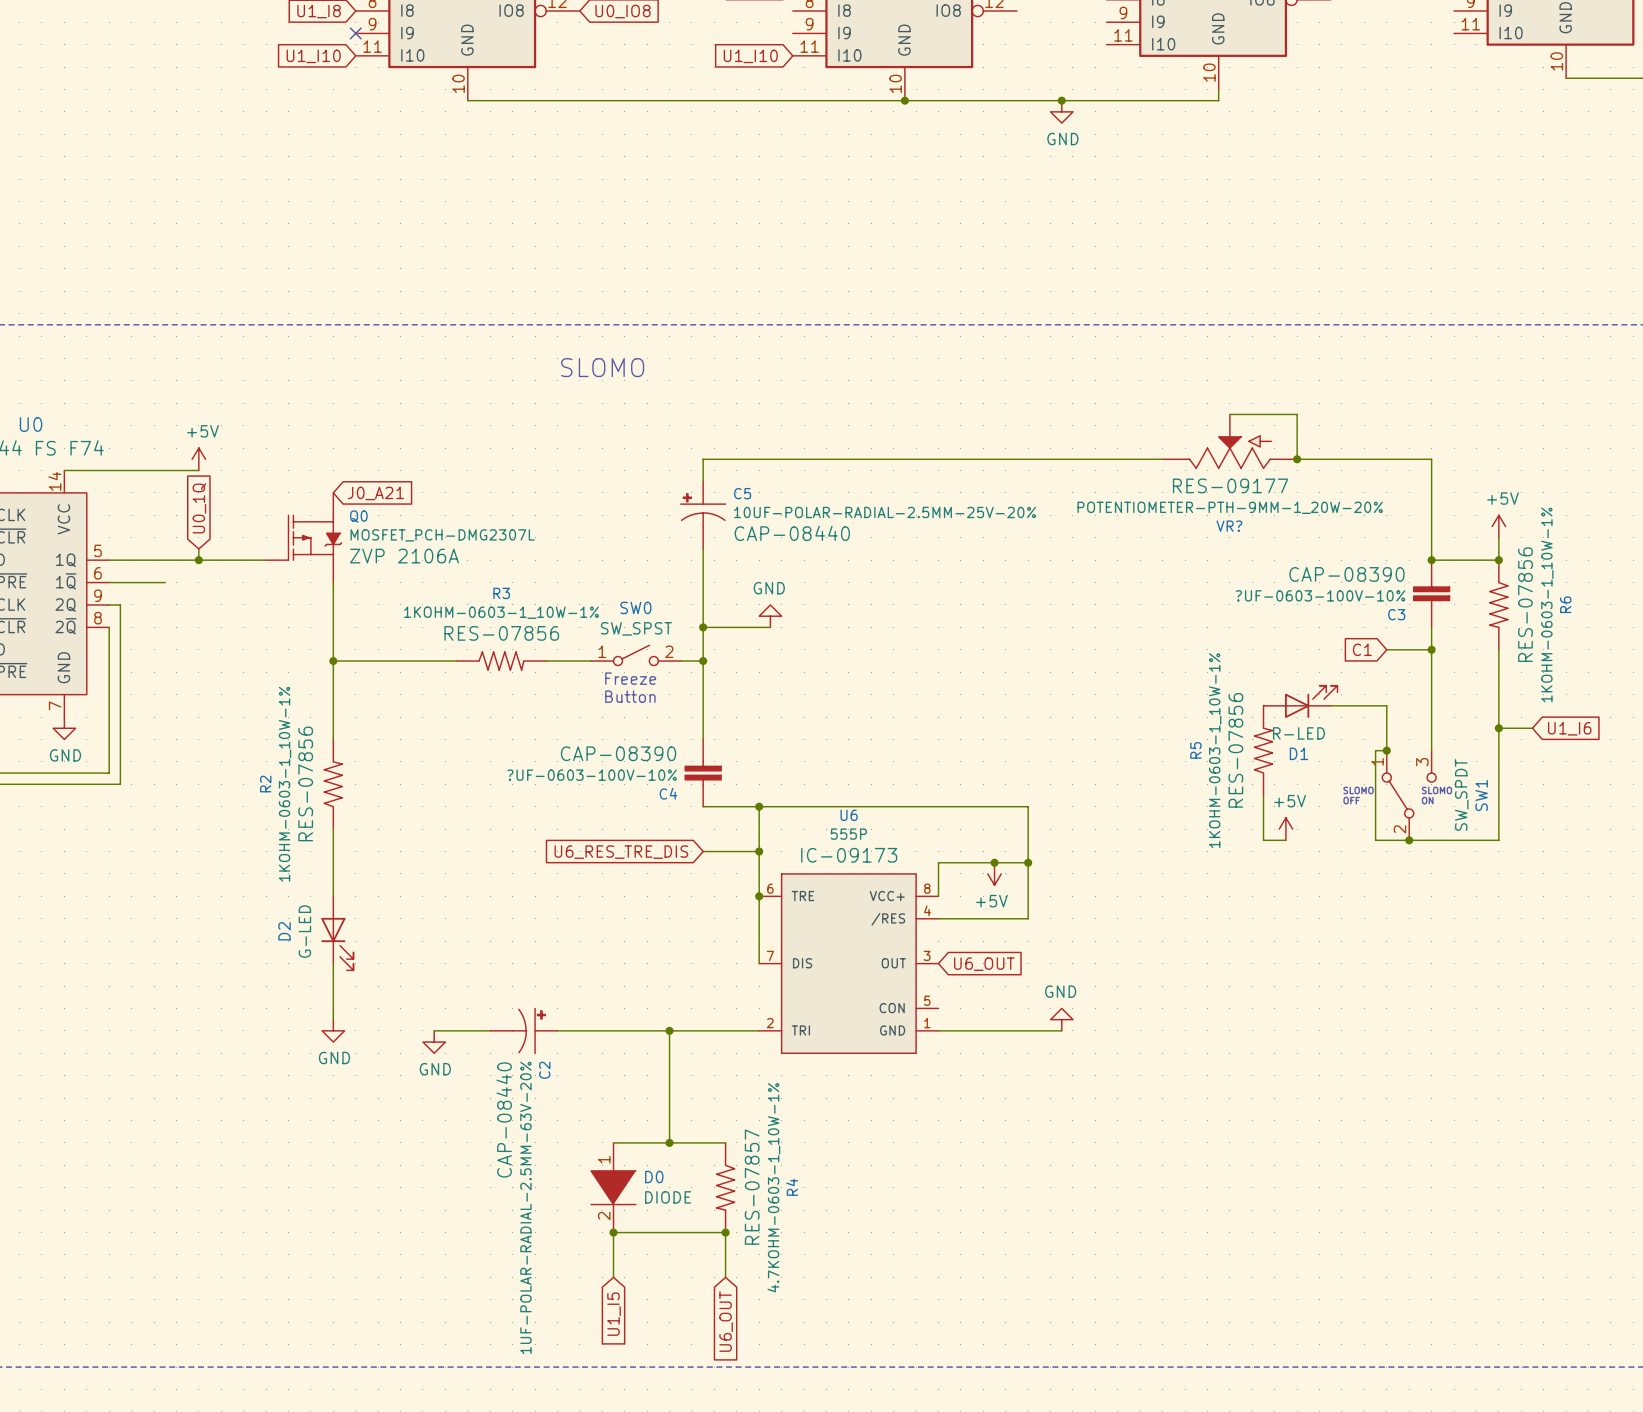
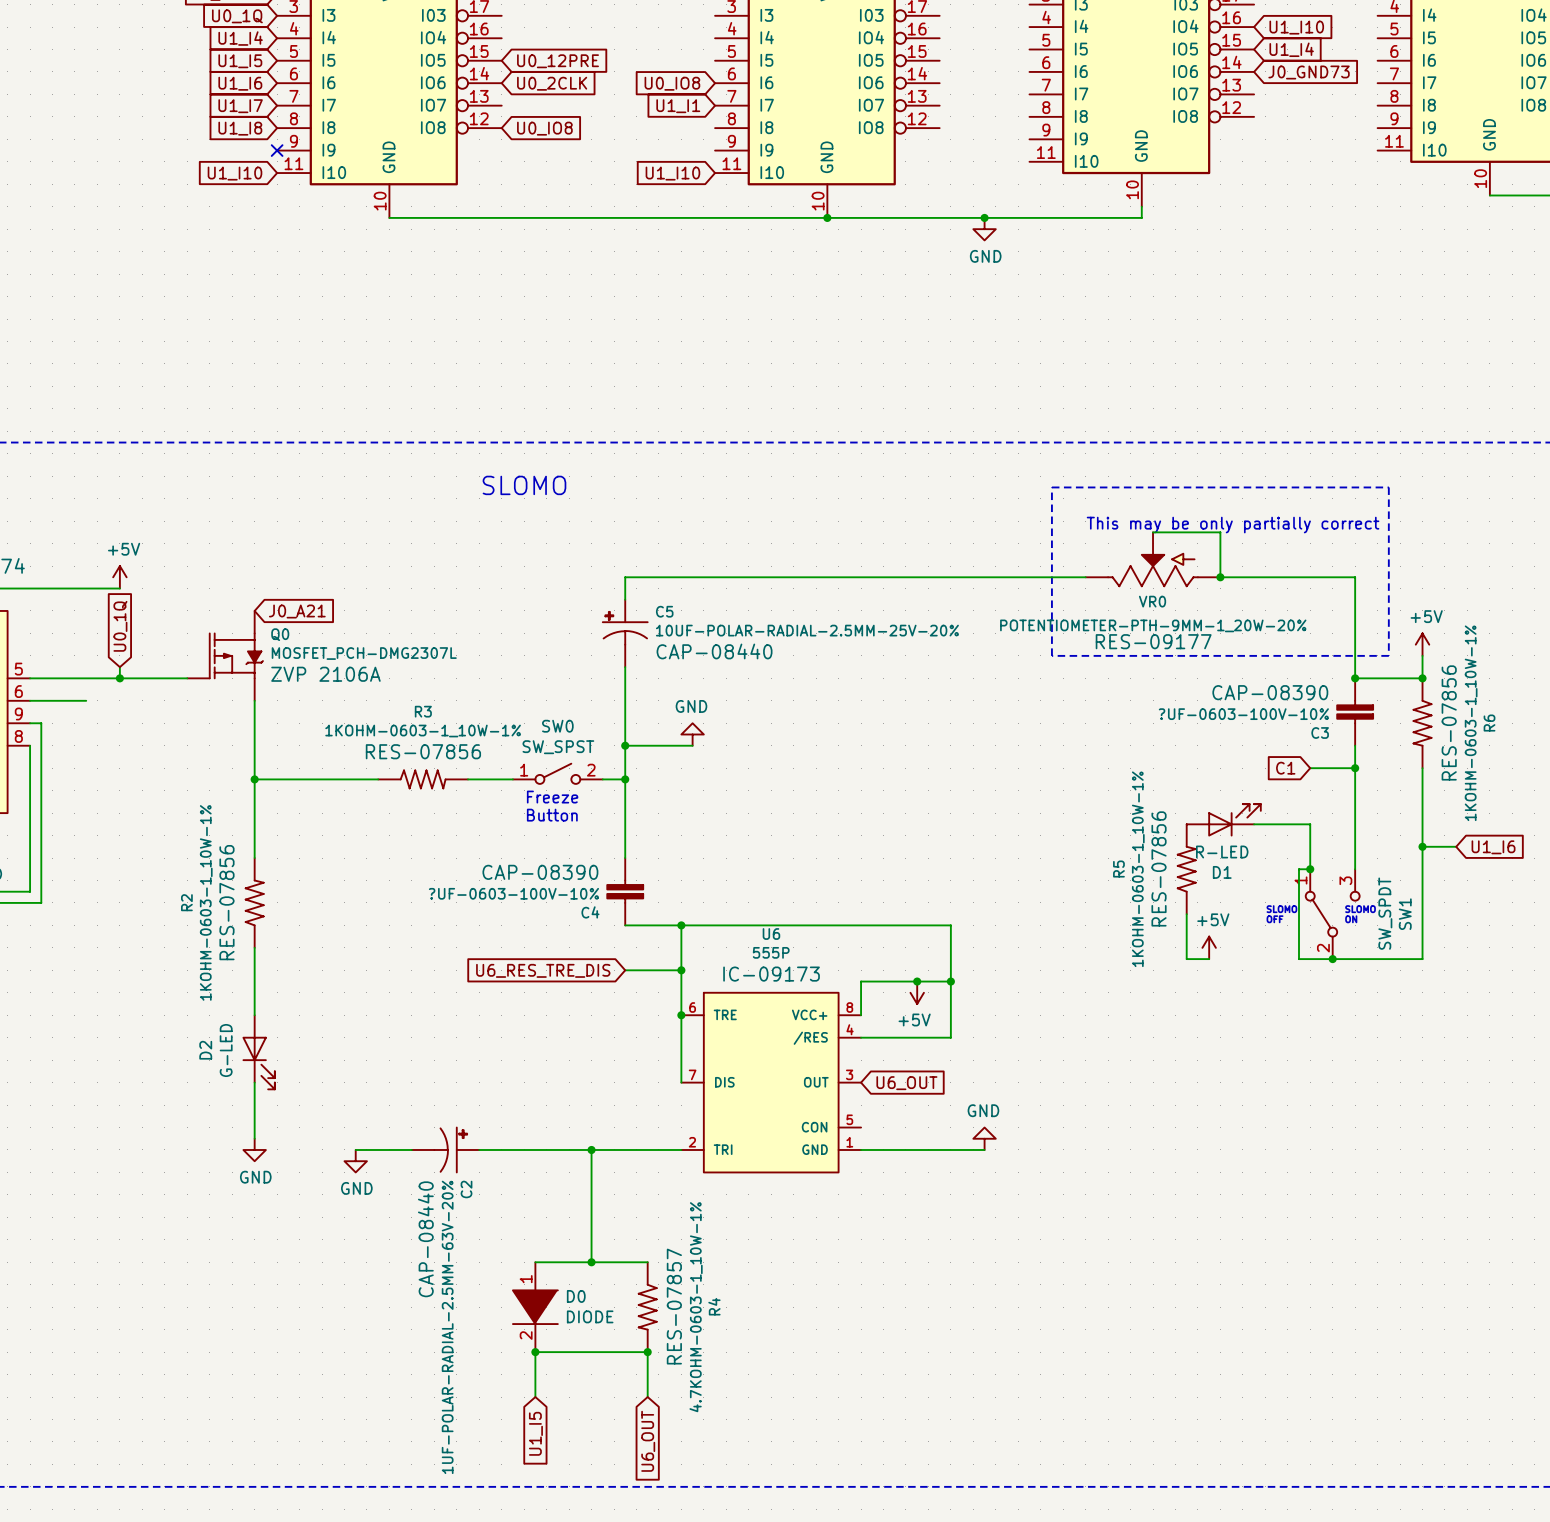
line: none -> (1051, 487) (1388, 487) (1388, 655) (1051, 655) (1051, 487)
text: none -> This may be only partially correct (1233, 525)
VR? text position: RES-09177 (1230, 485) -> RES-09177 (1153, 641)
VR? name: VR? (1229, 526) -> VR0 (1152, 601)

